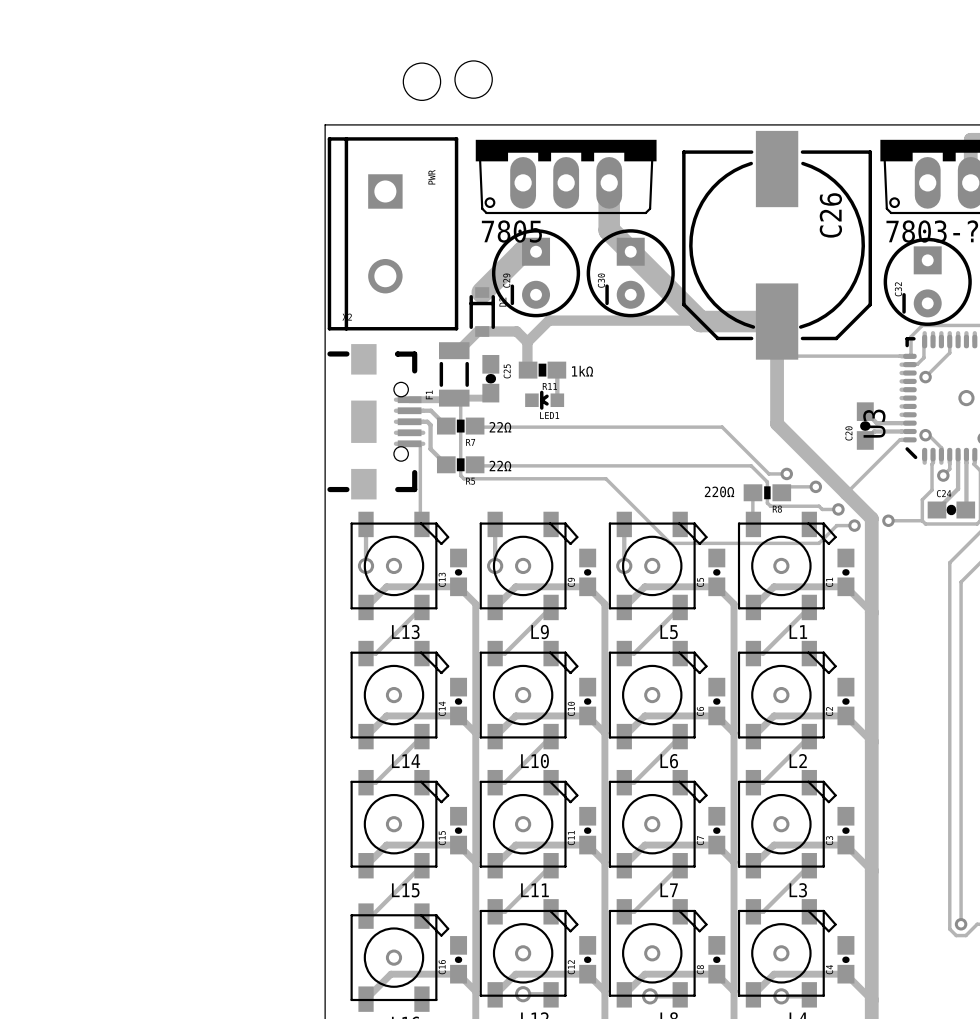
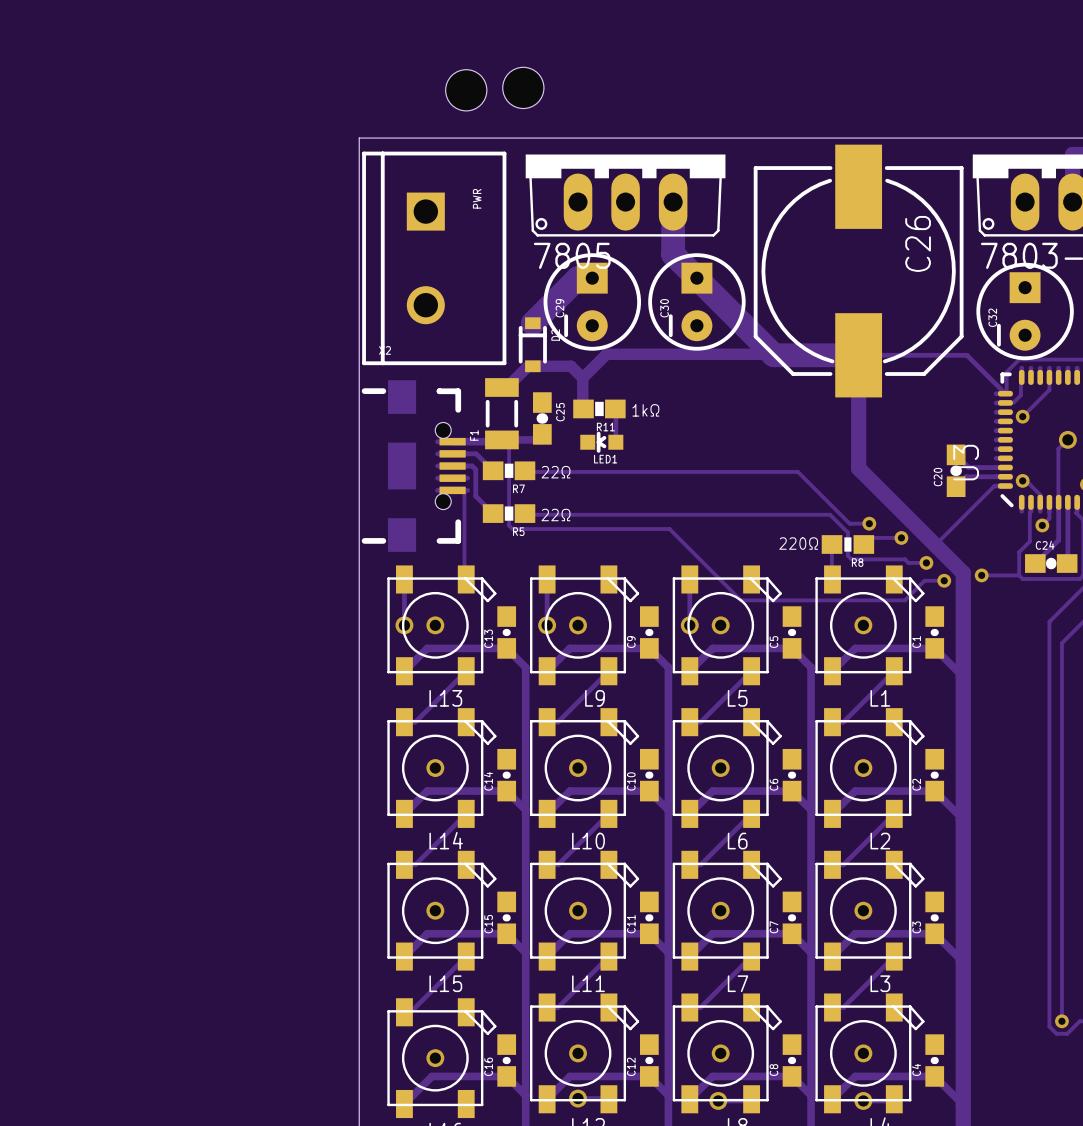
track: (777, 321) (783, 356) (901, 356) -> (858, 355) (966, 355) (1005, 393)
track: none -> (1067, 439) (1058, 448) (1058, 502)

